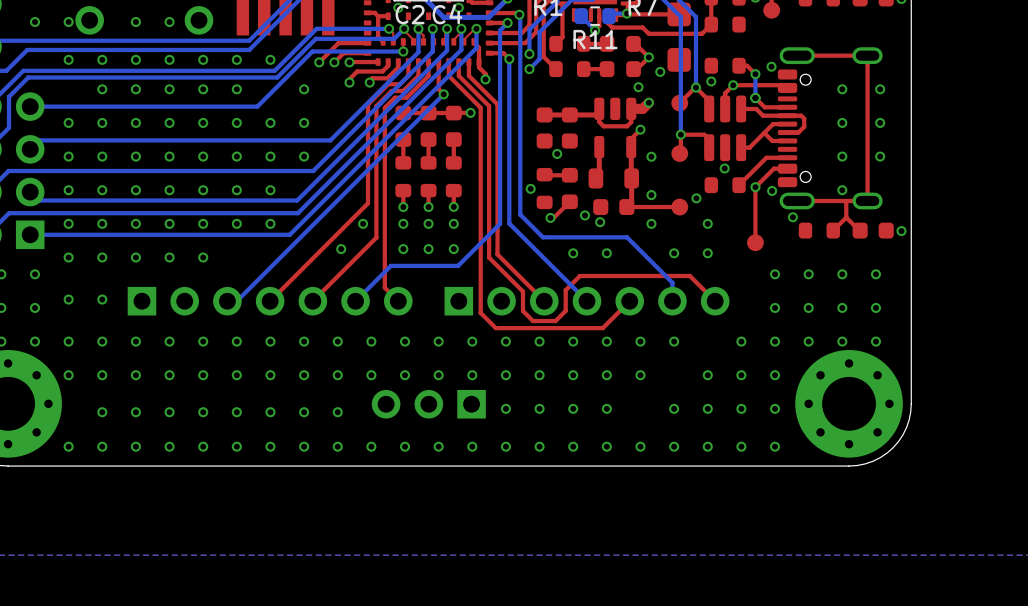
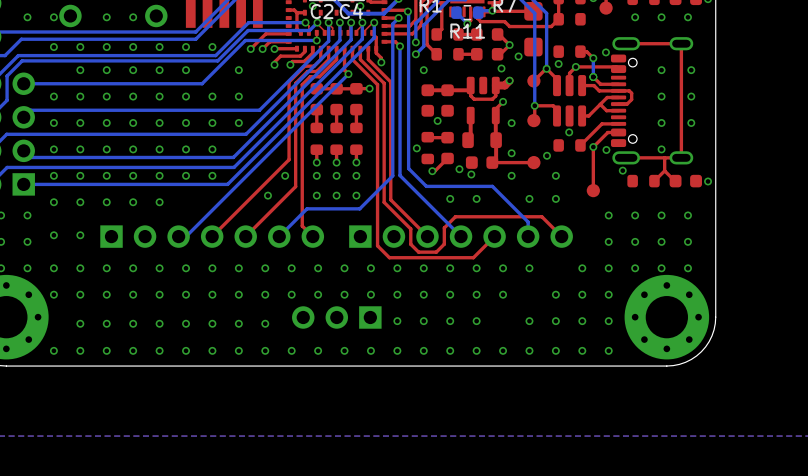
via: none -> (635, 17)
via: none -> (661, 17)
via: none -> (687, 17)
via: none -> (423, 70)

